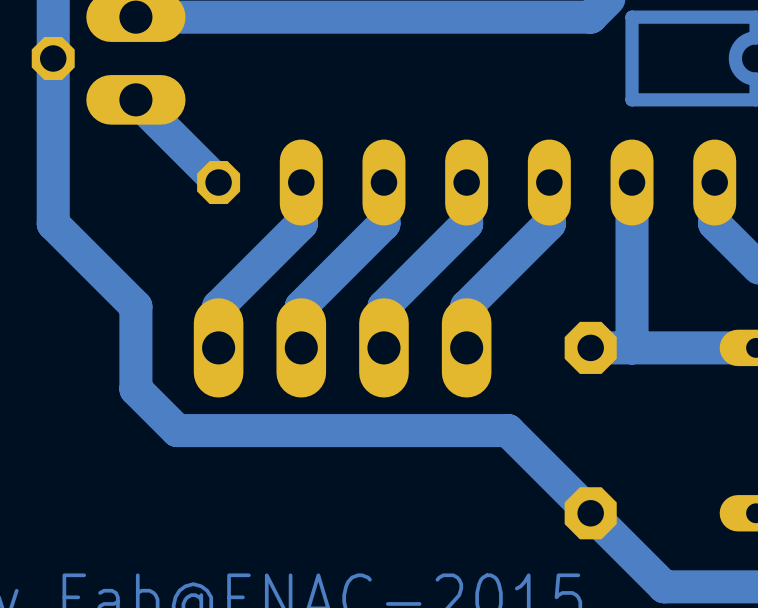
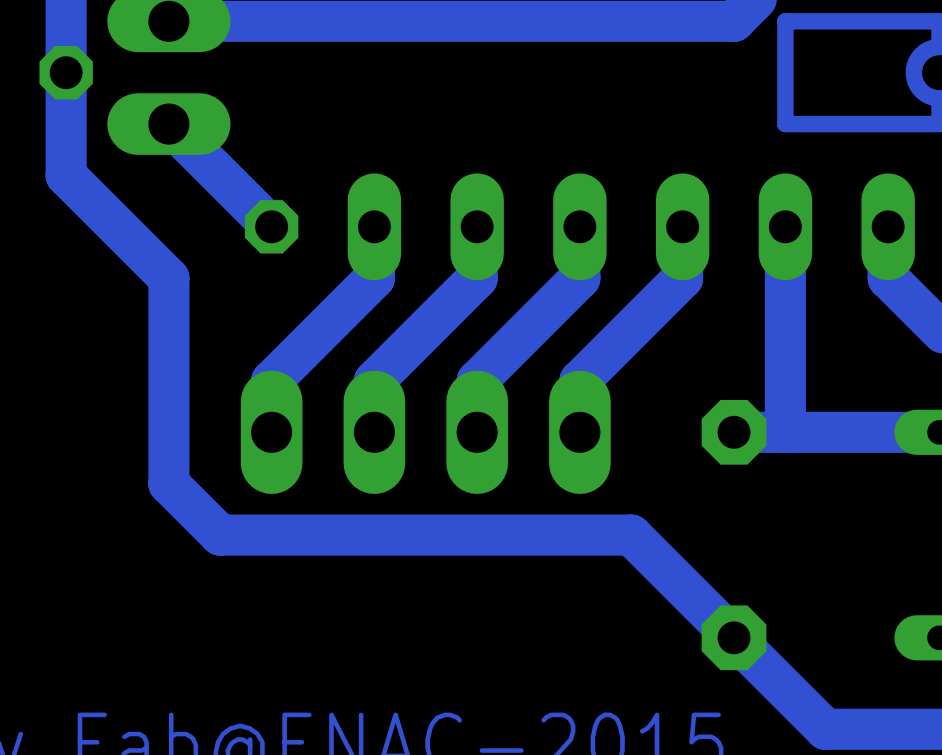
track: (53, 141) (53, 223) (135, 306) -> (66, 175) (168, 278) (168, 380)

